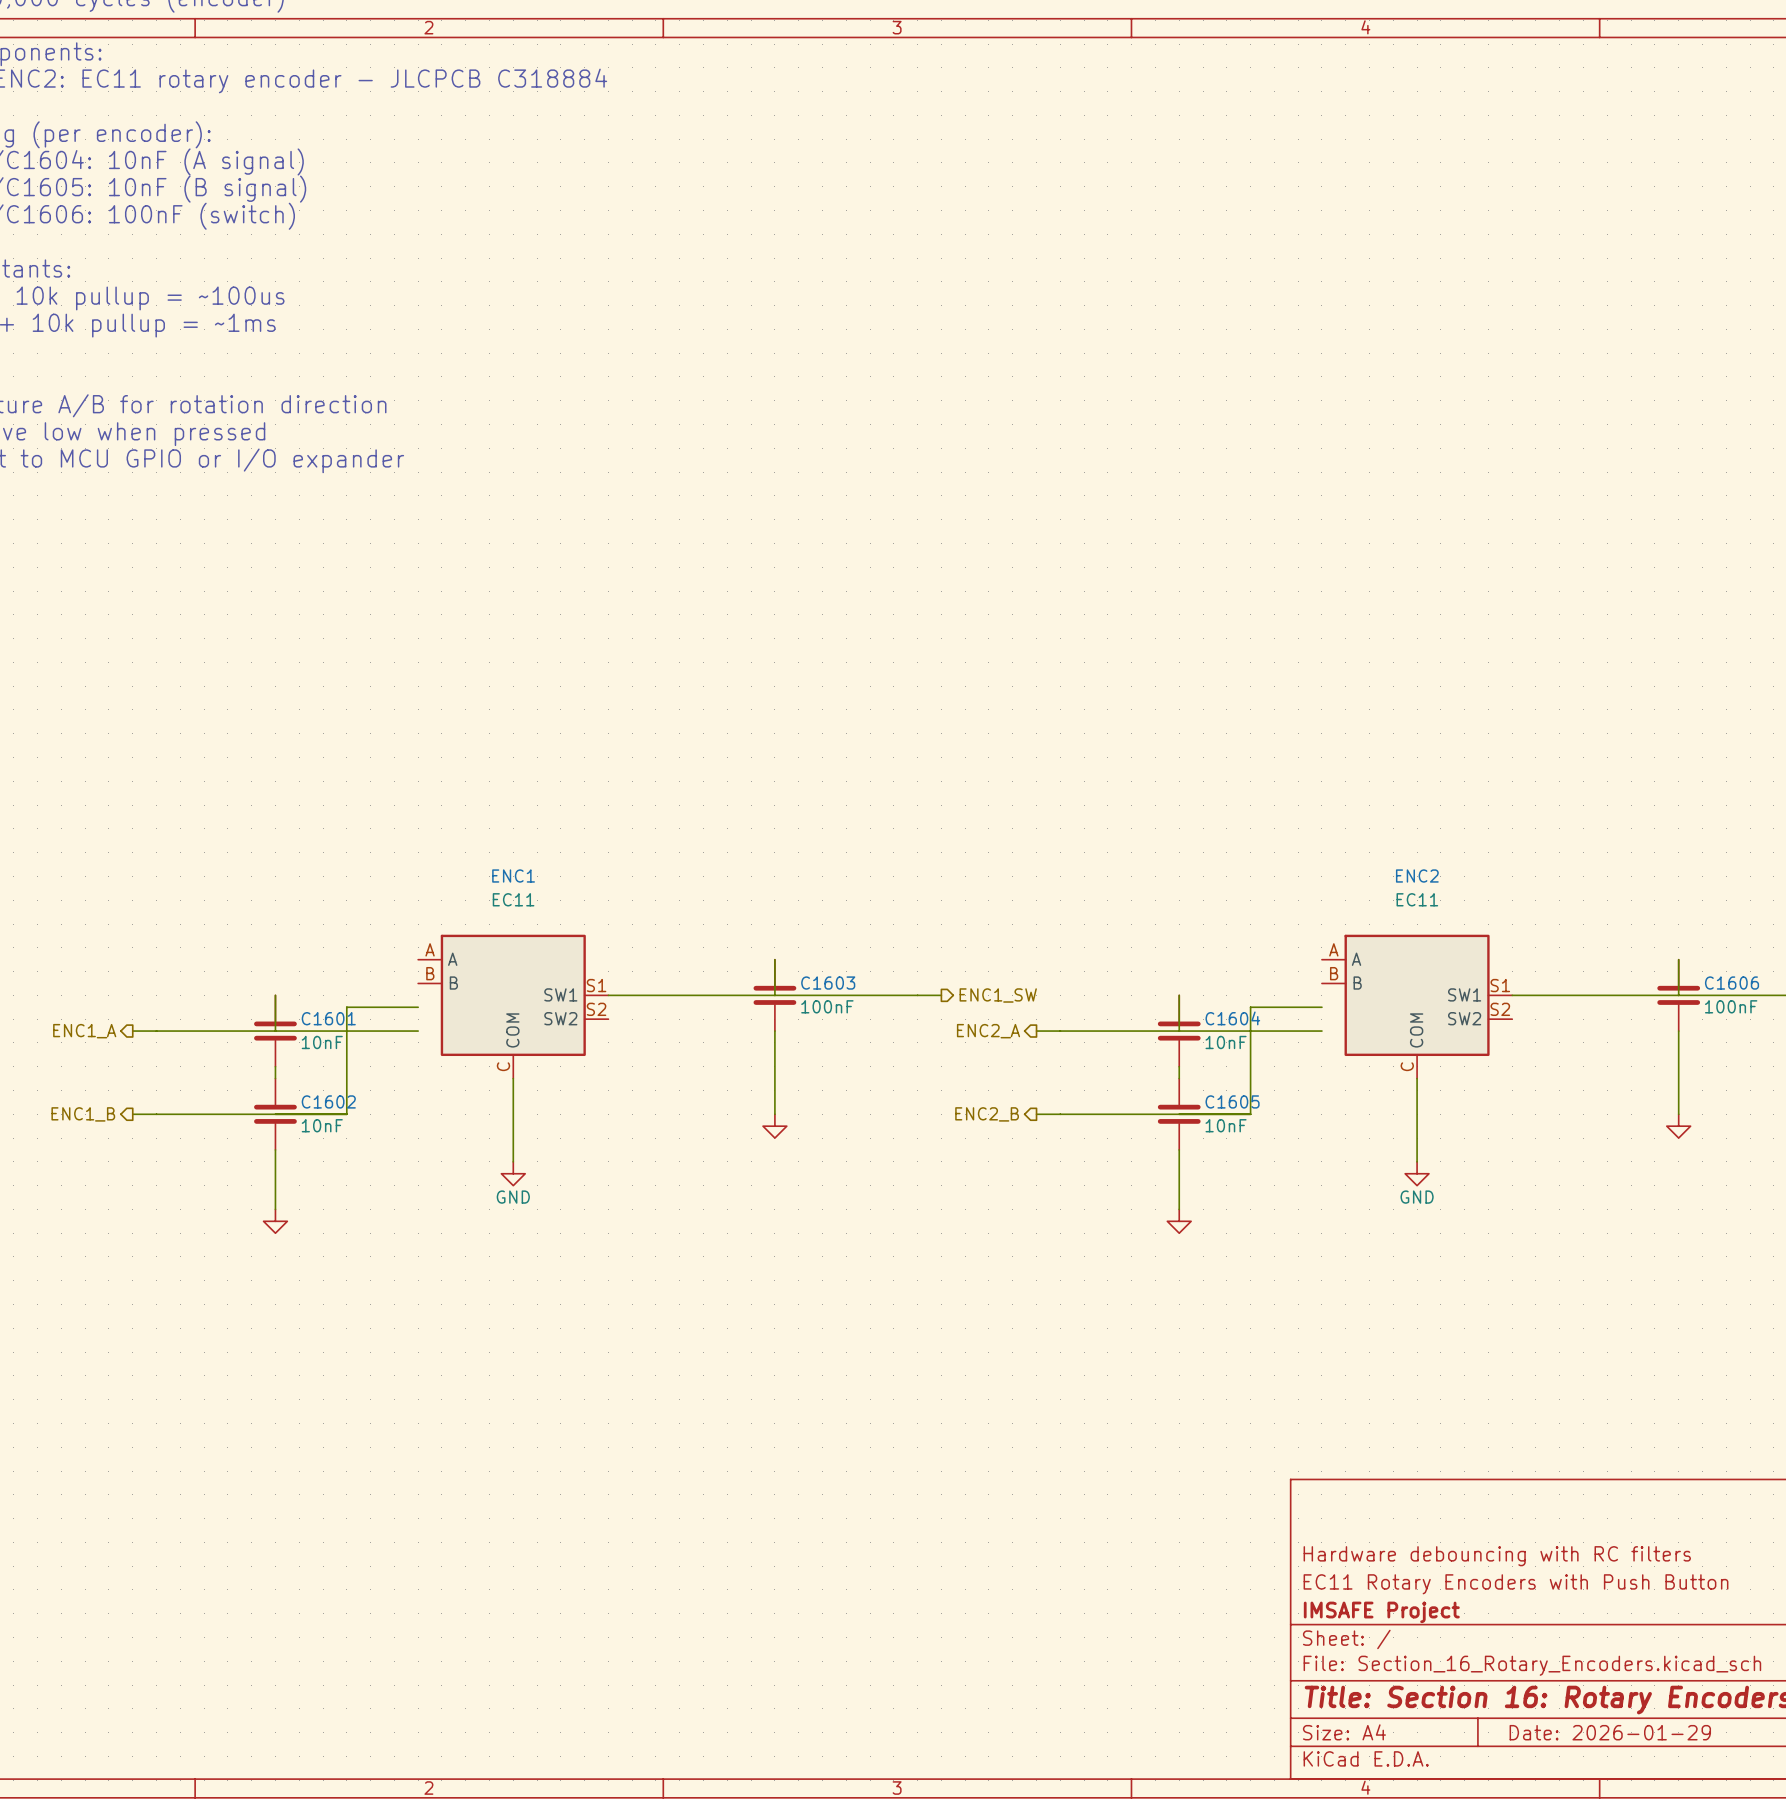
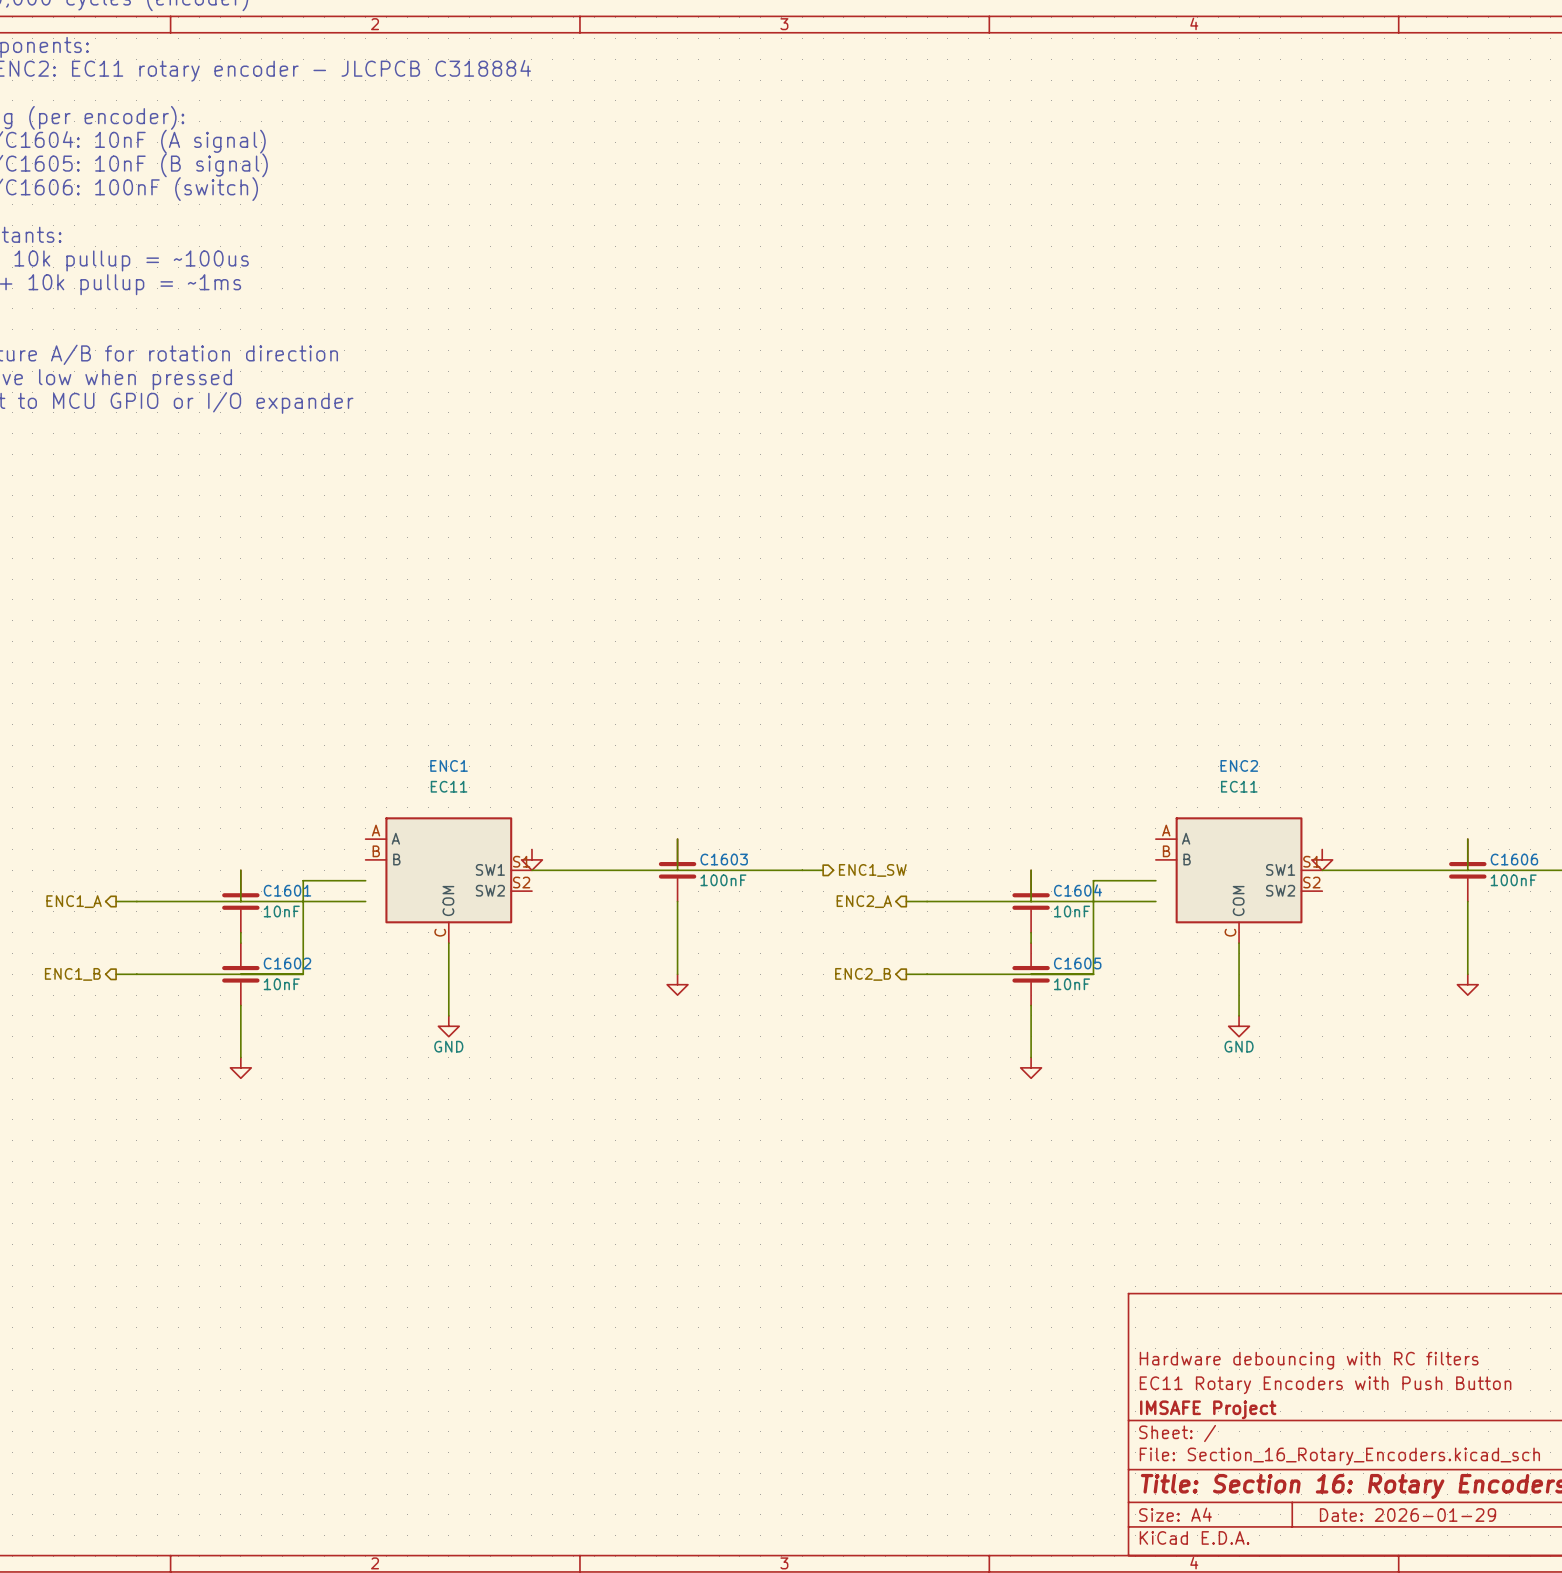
power symbol: none -> (531, 859)
power symbol: none -> (1322, 859)

